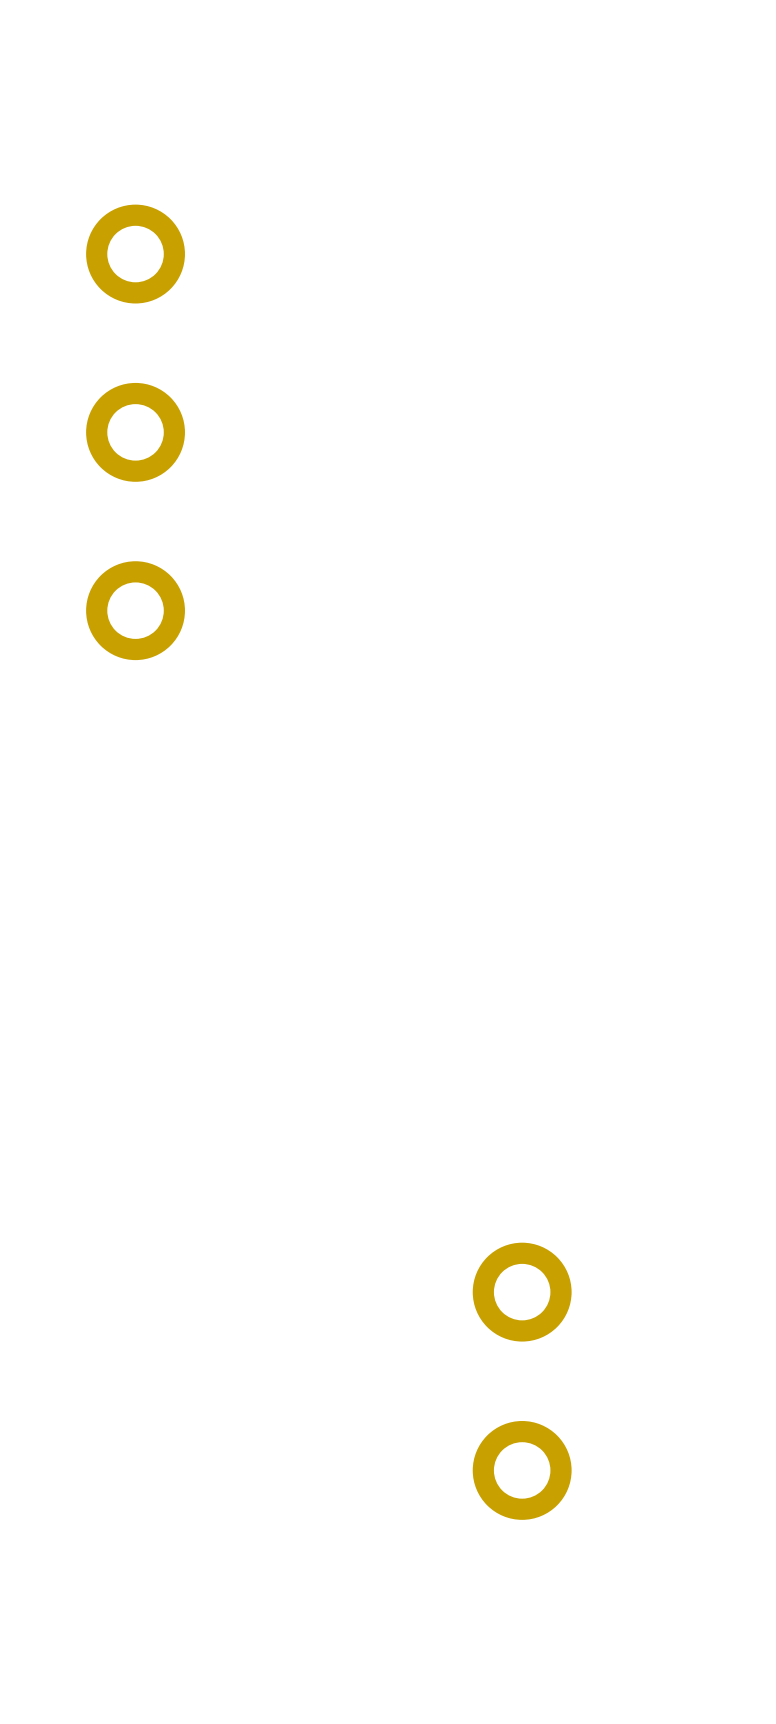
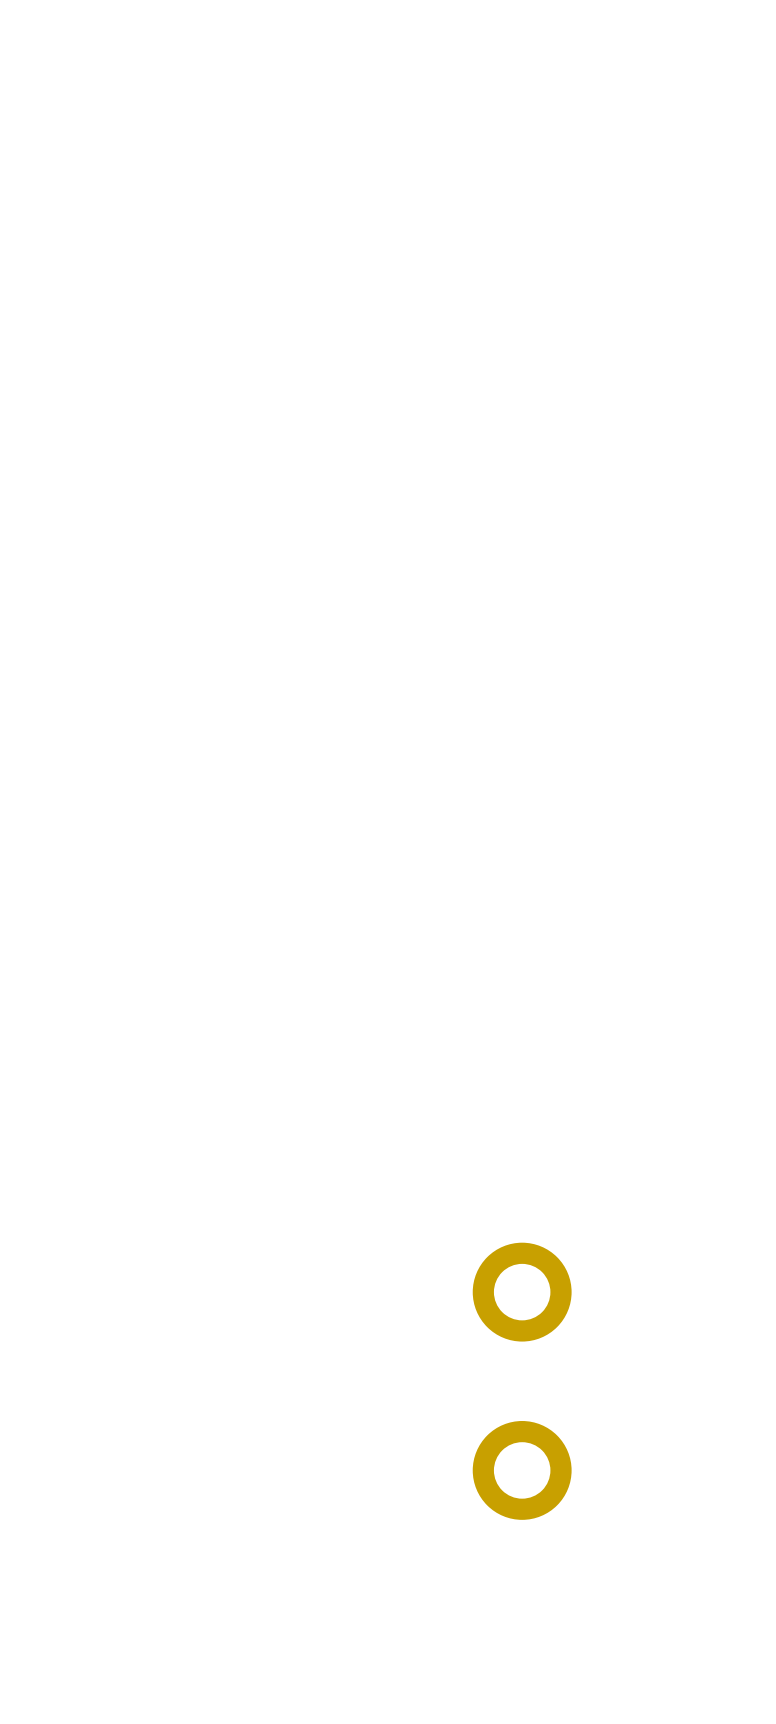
part: (135, 254) -> none
part: (135, 432) -> none
part: (135, 610) -> none

